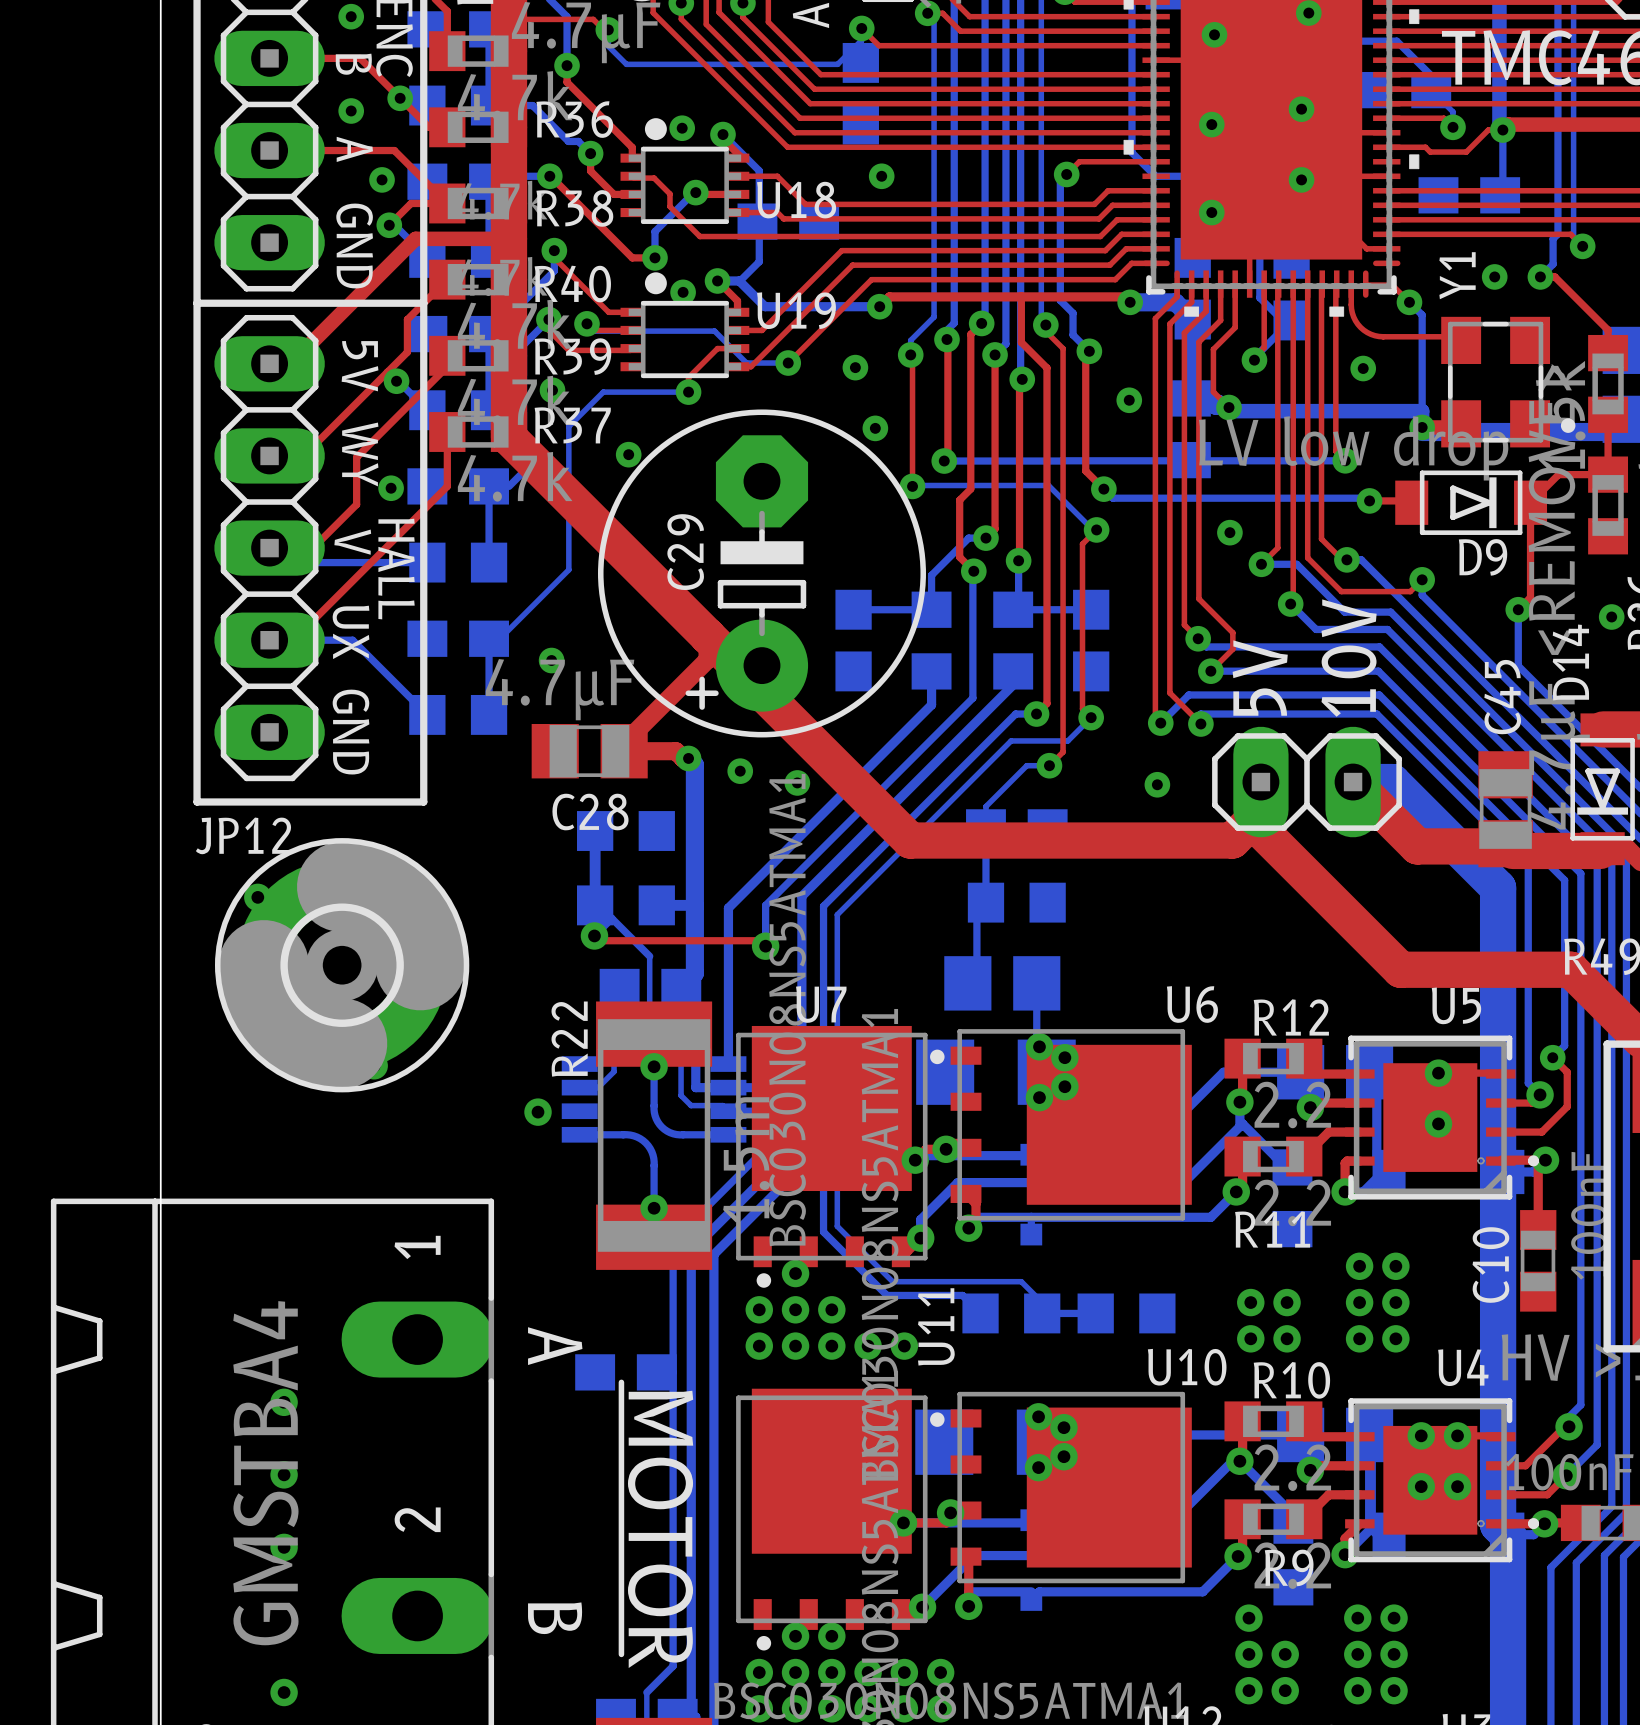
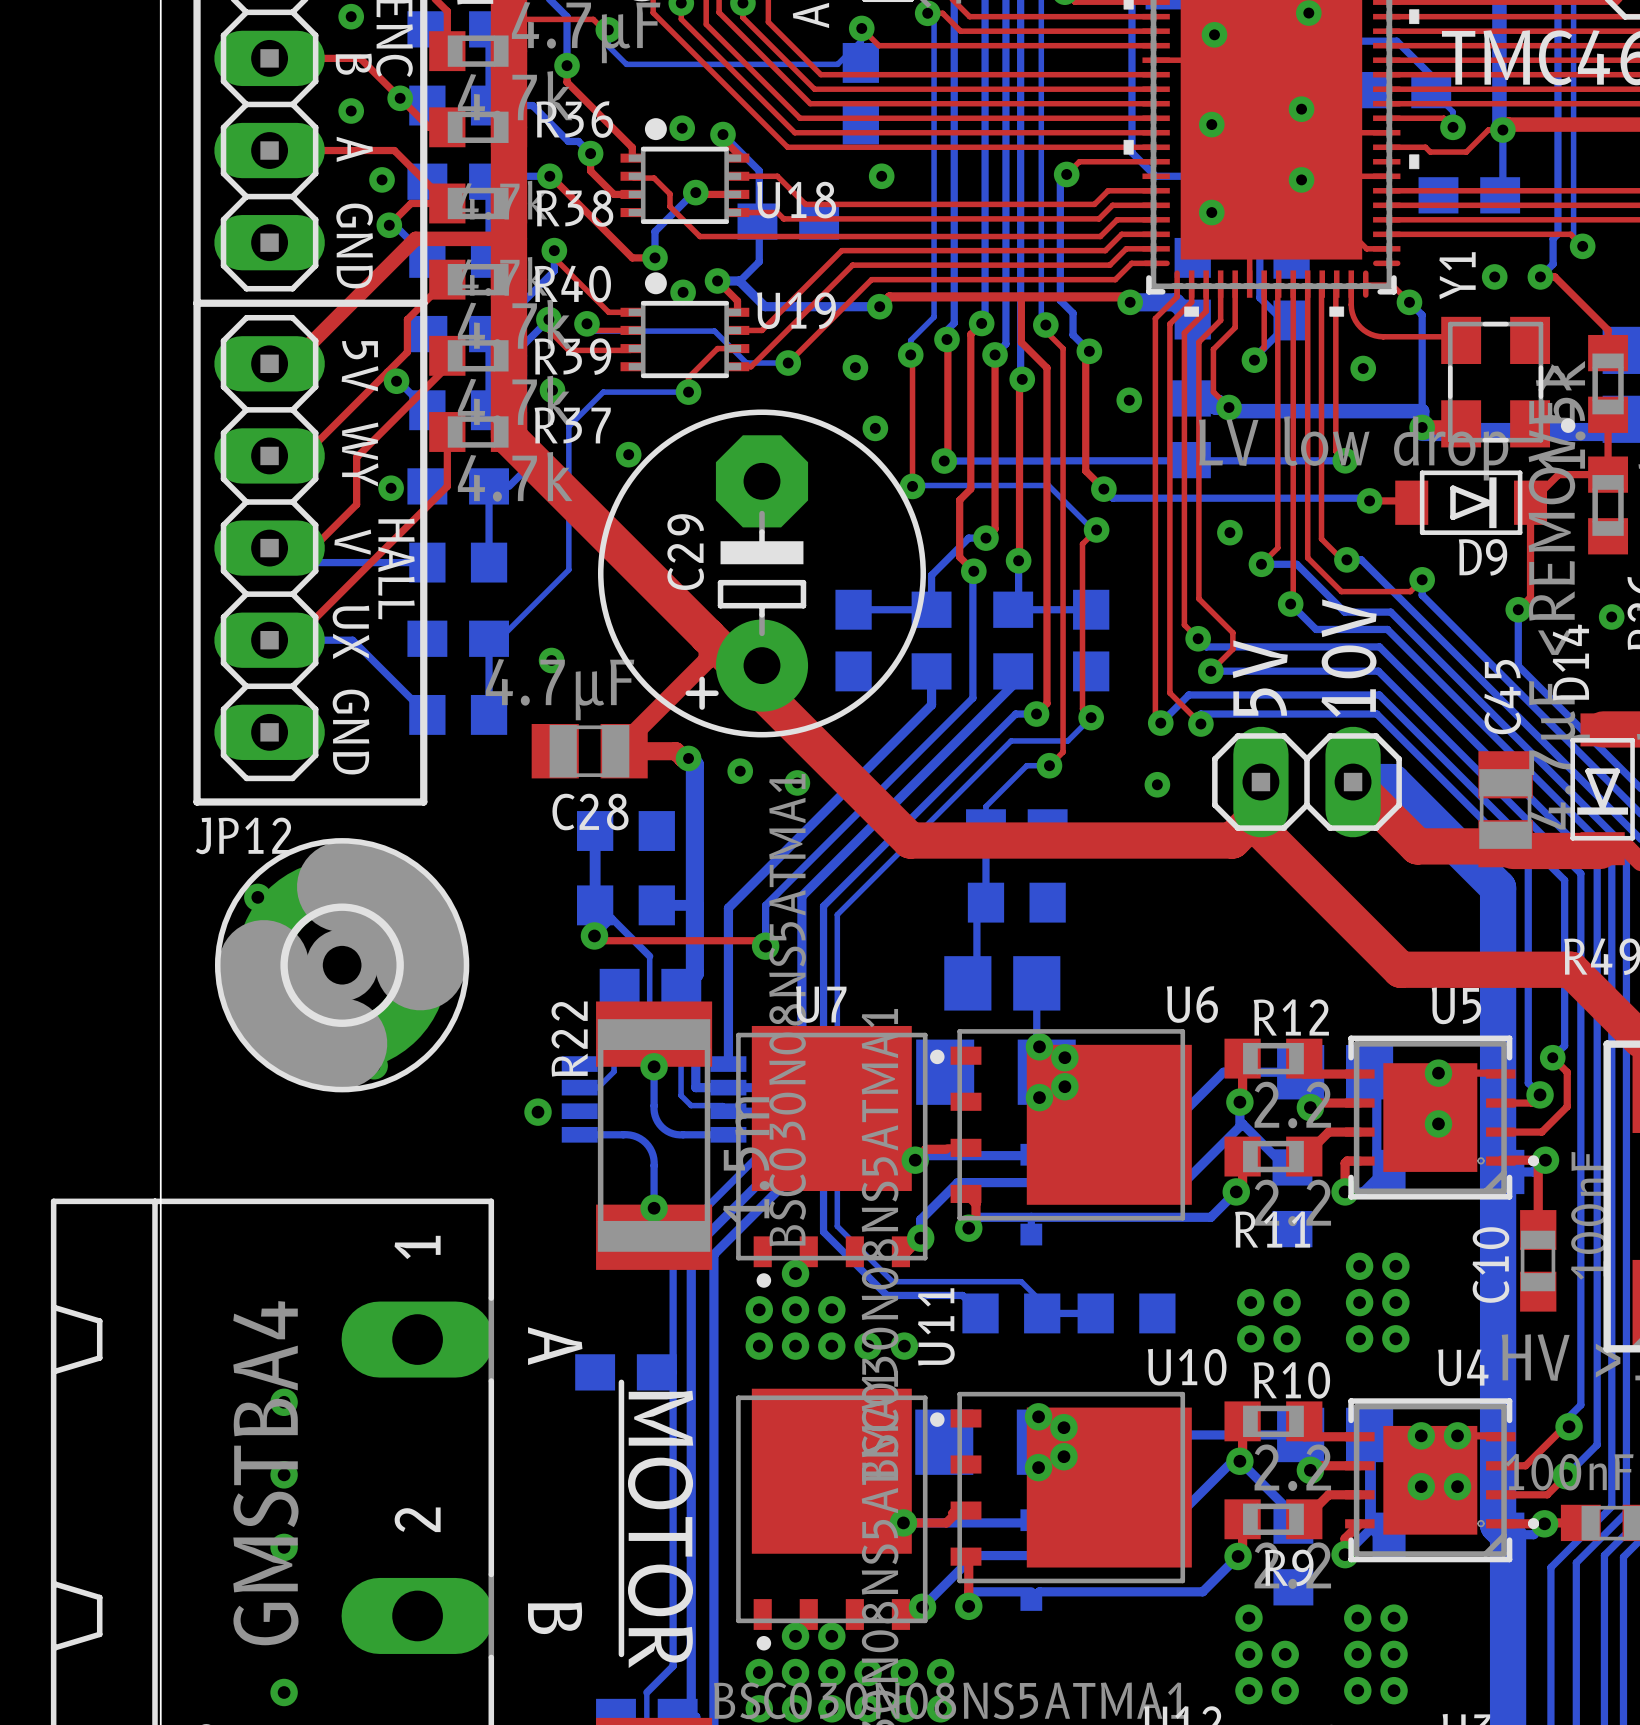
via: (946, 1149) -> none
via: (950, 1512) -> none

